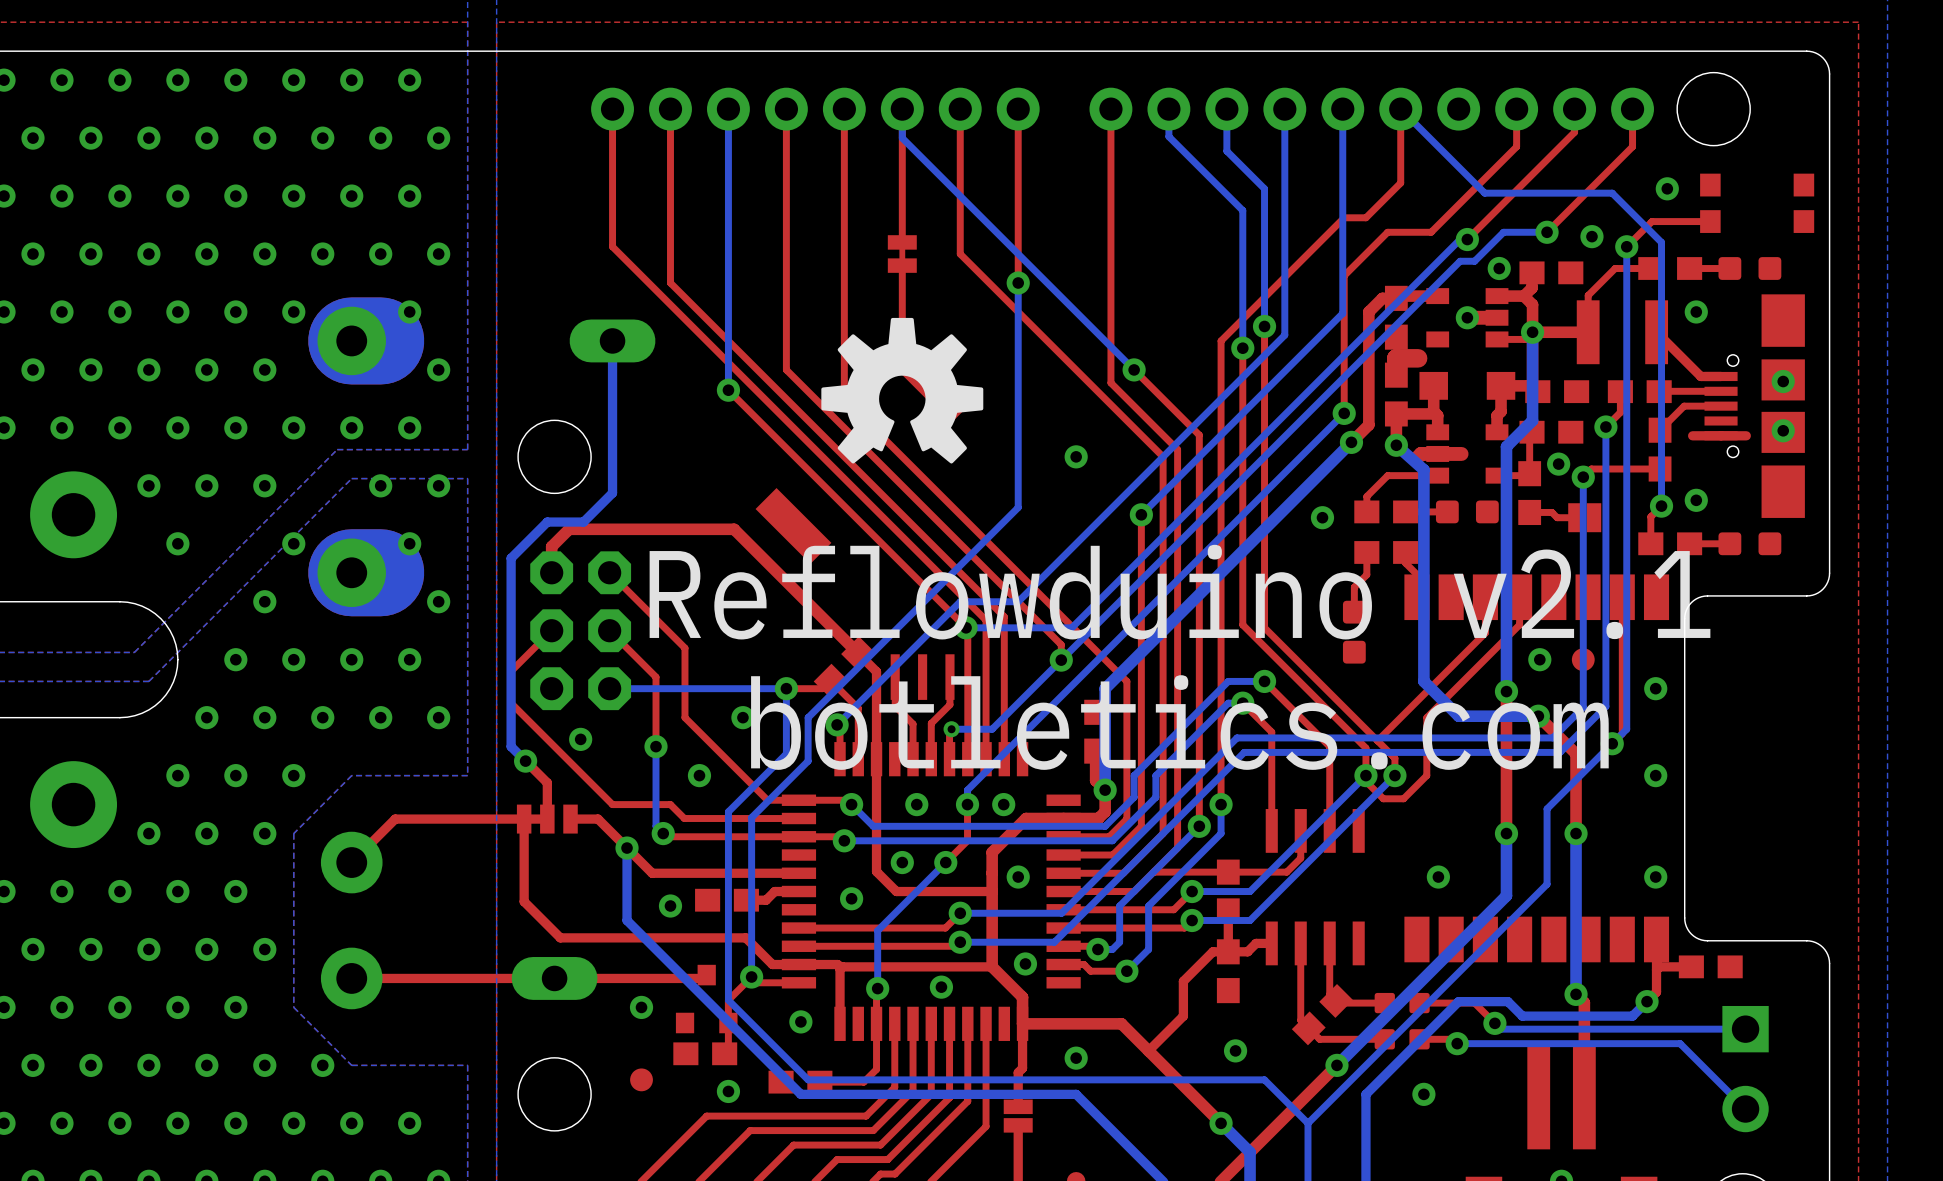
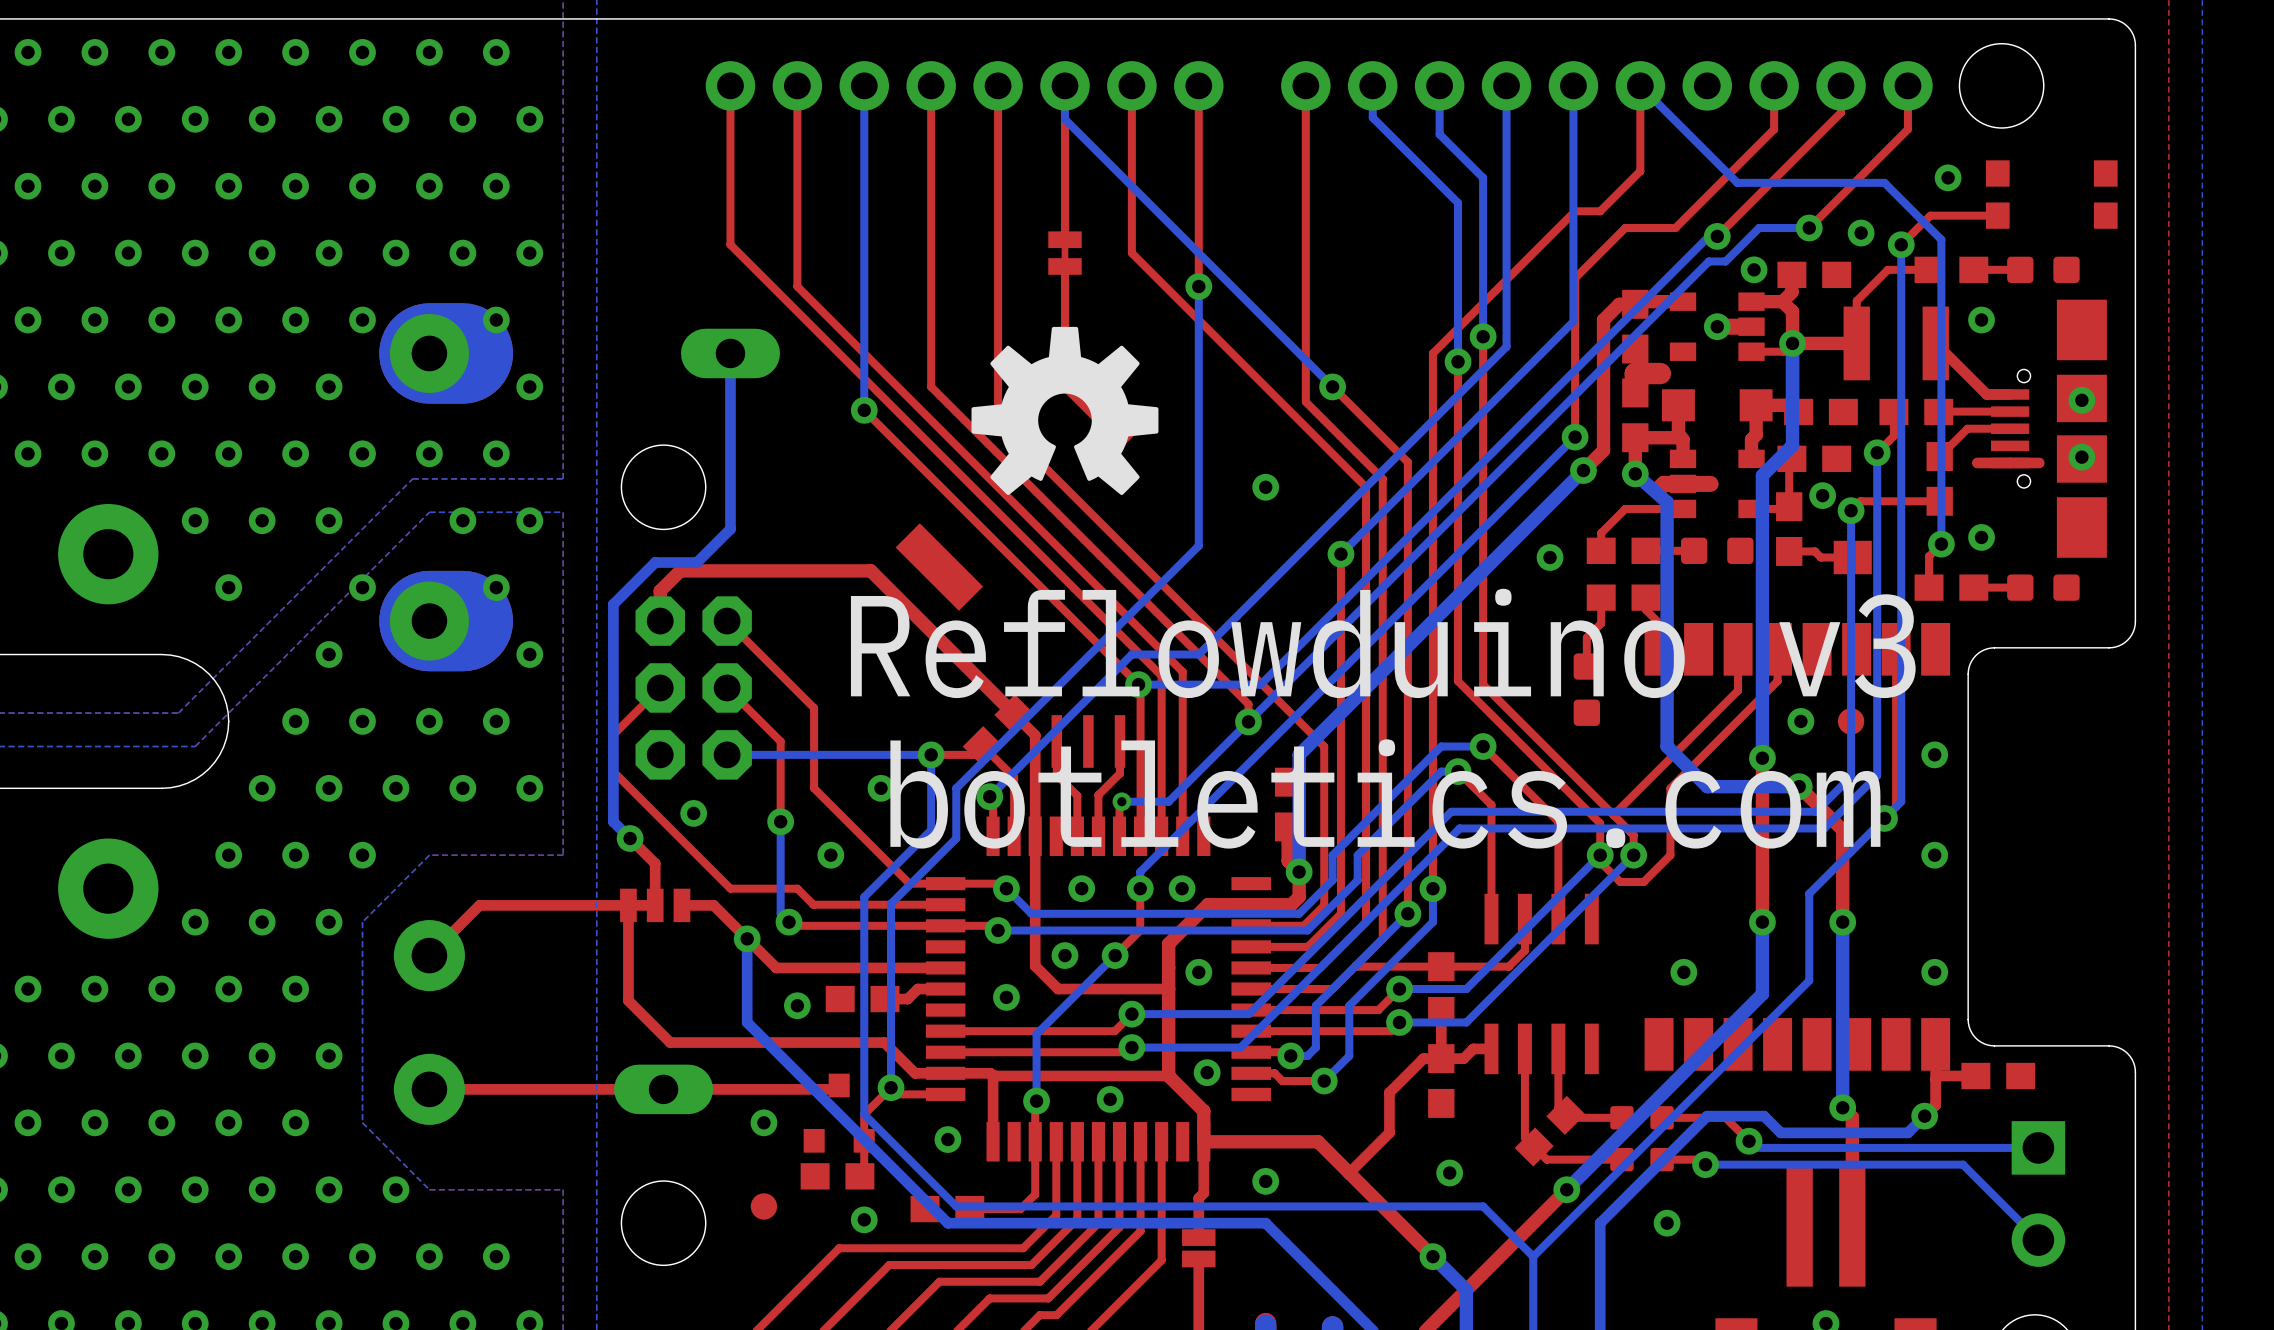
text: Reflowduino v2.1 (1180, 592) -> Reflowduino v3 (1383, 643)

